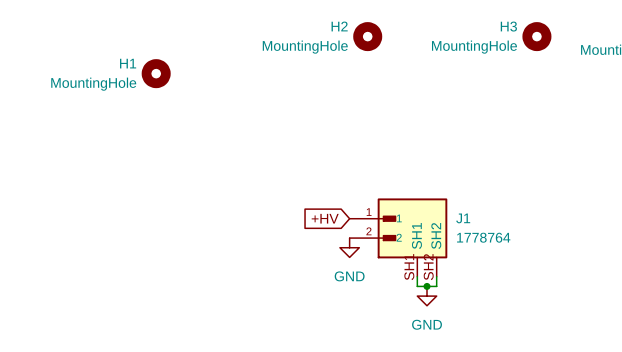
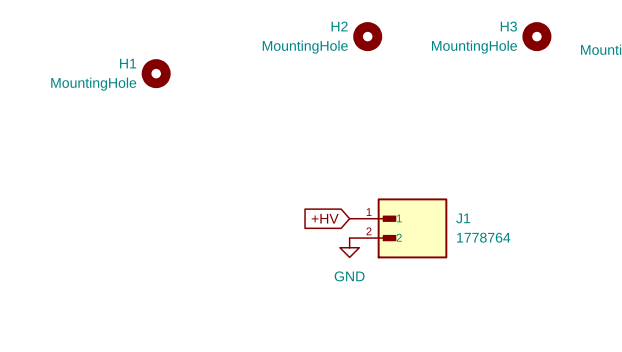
J1 symbol: [349, 198, 448, 277] -> [349, 198, 448, 259]
wire: (417, 276) (417, 286) (436, 286) (436, 276) -> none
junction: (427, 286) -> none
power symbol: GND (427, 296) -> none

